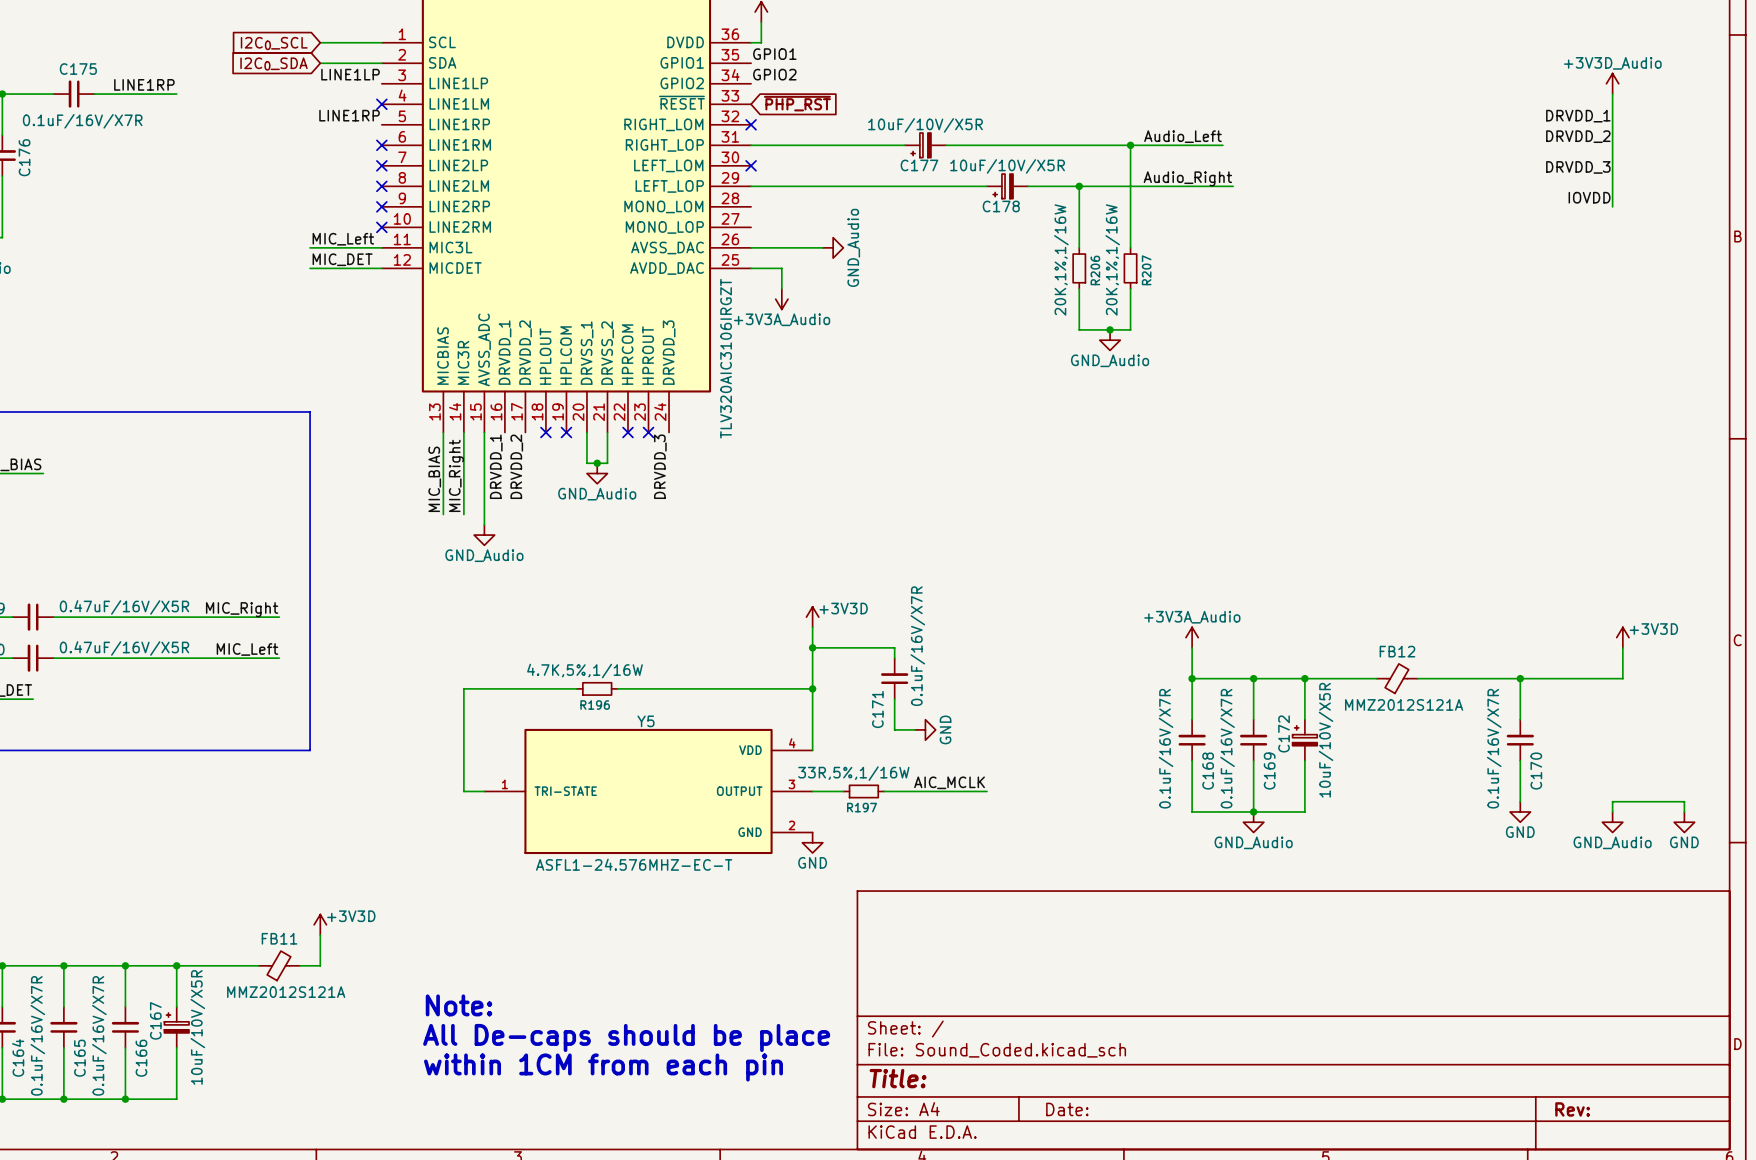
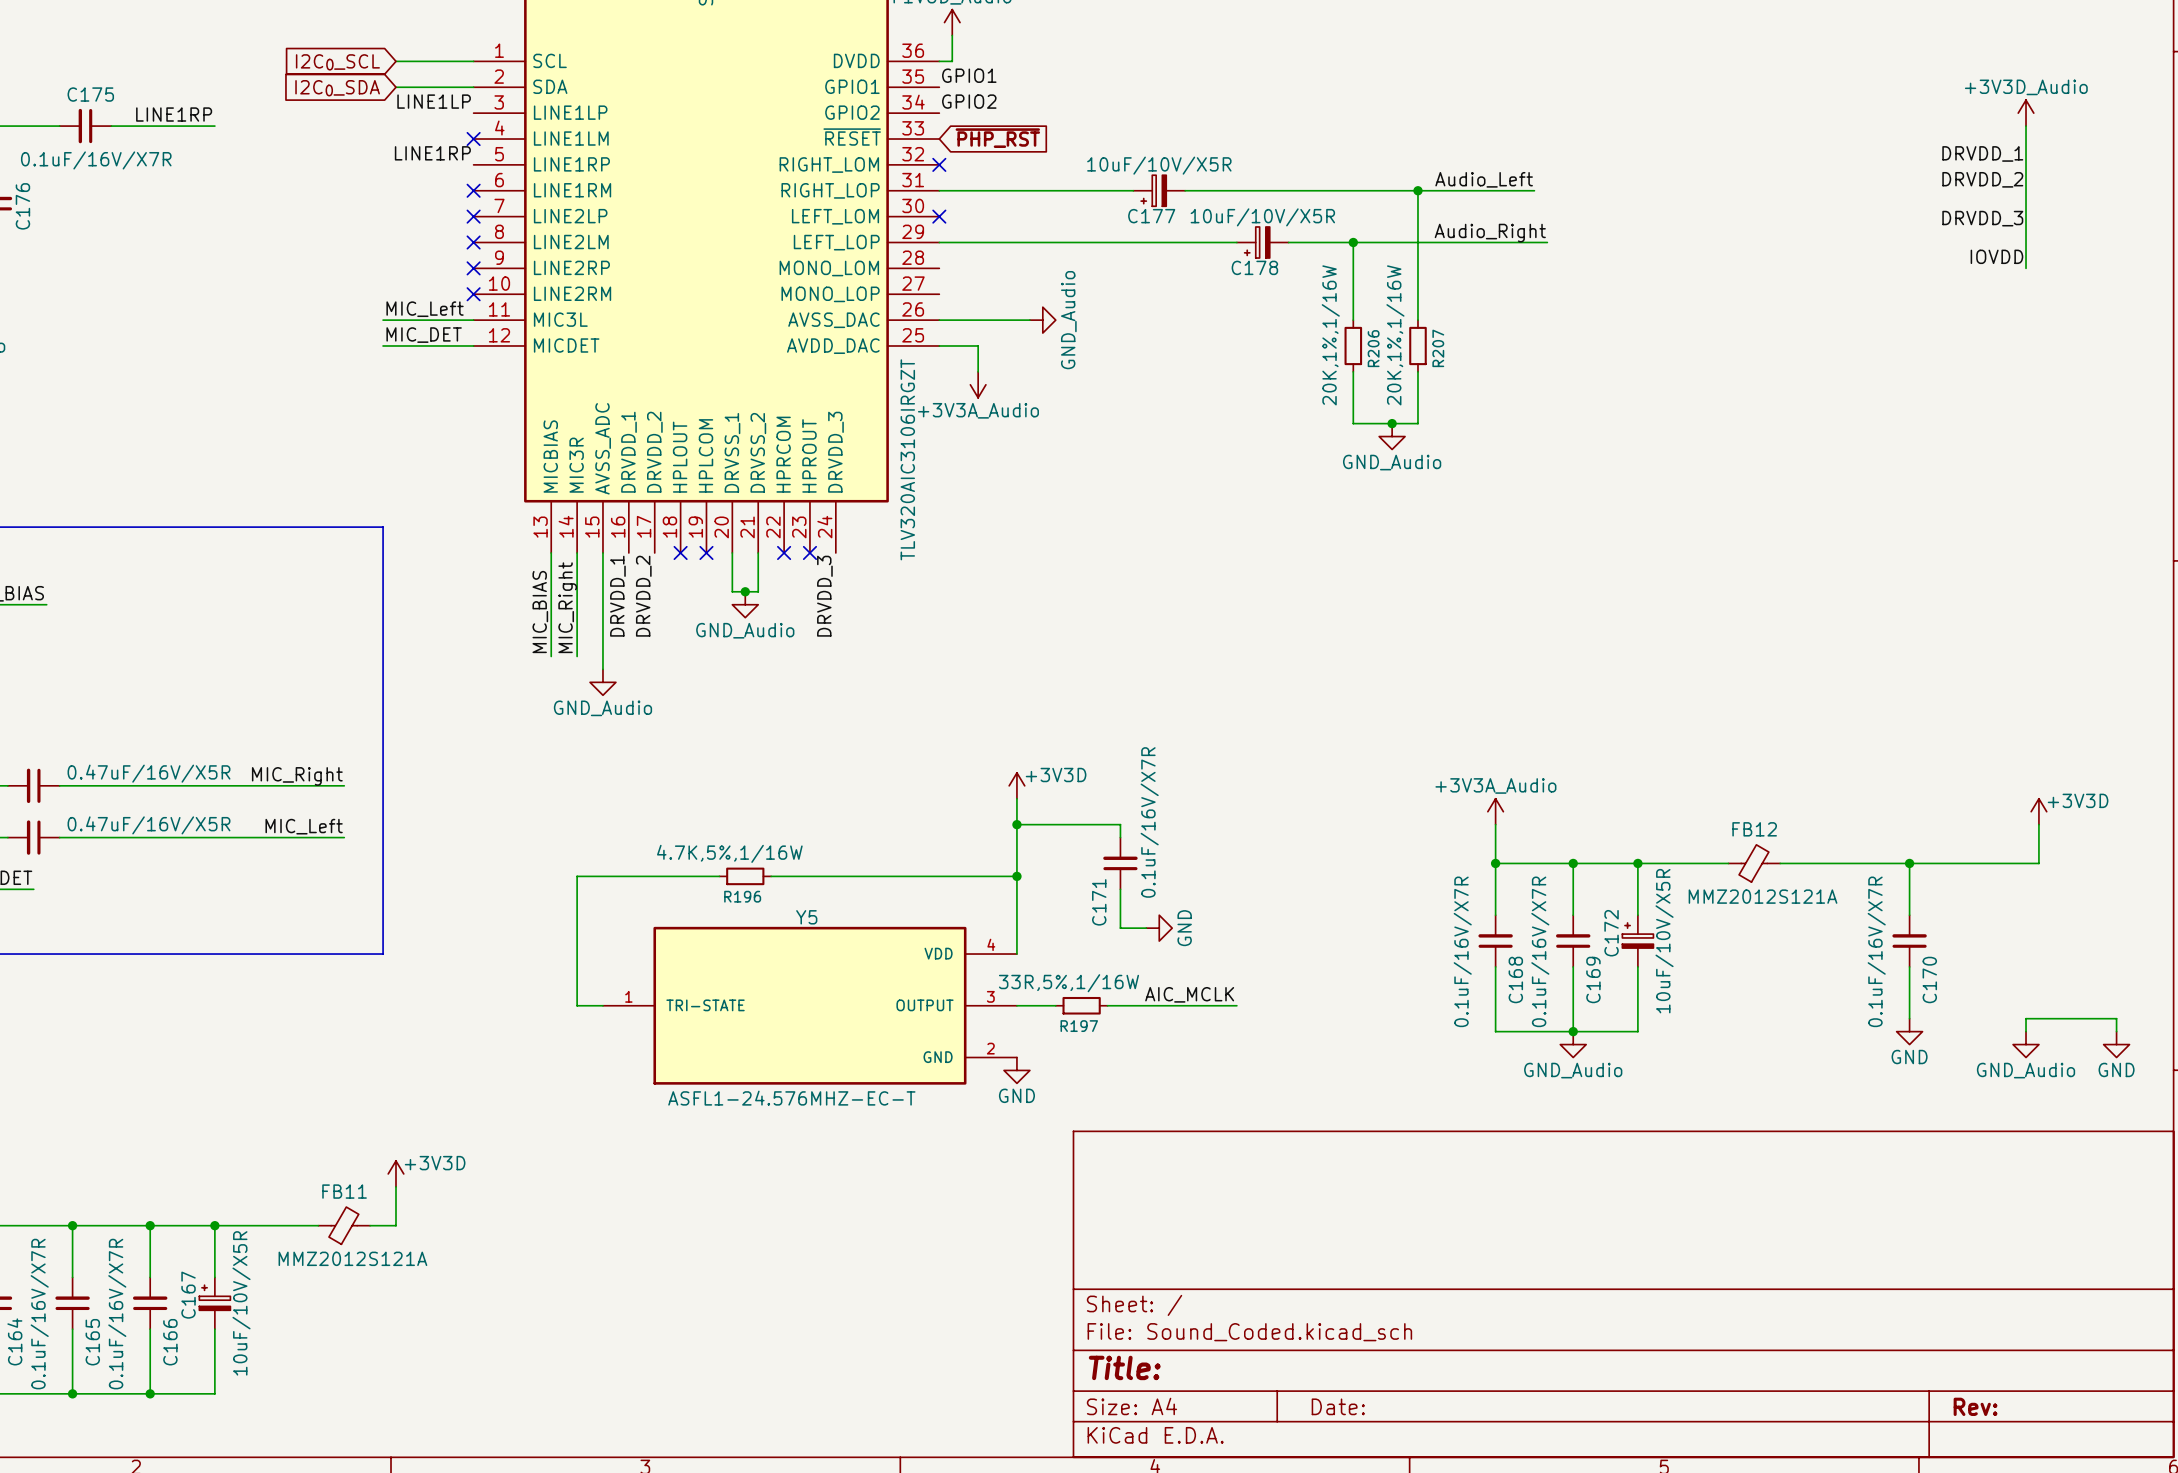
text: Note: (459, 1005) -> none
text: All De-caps should be place (626, 1037) -> none
text: within 1CM from each pin (603, 1067) -> none

